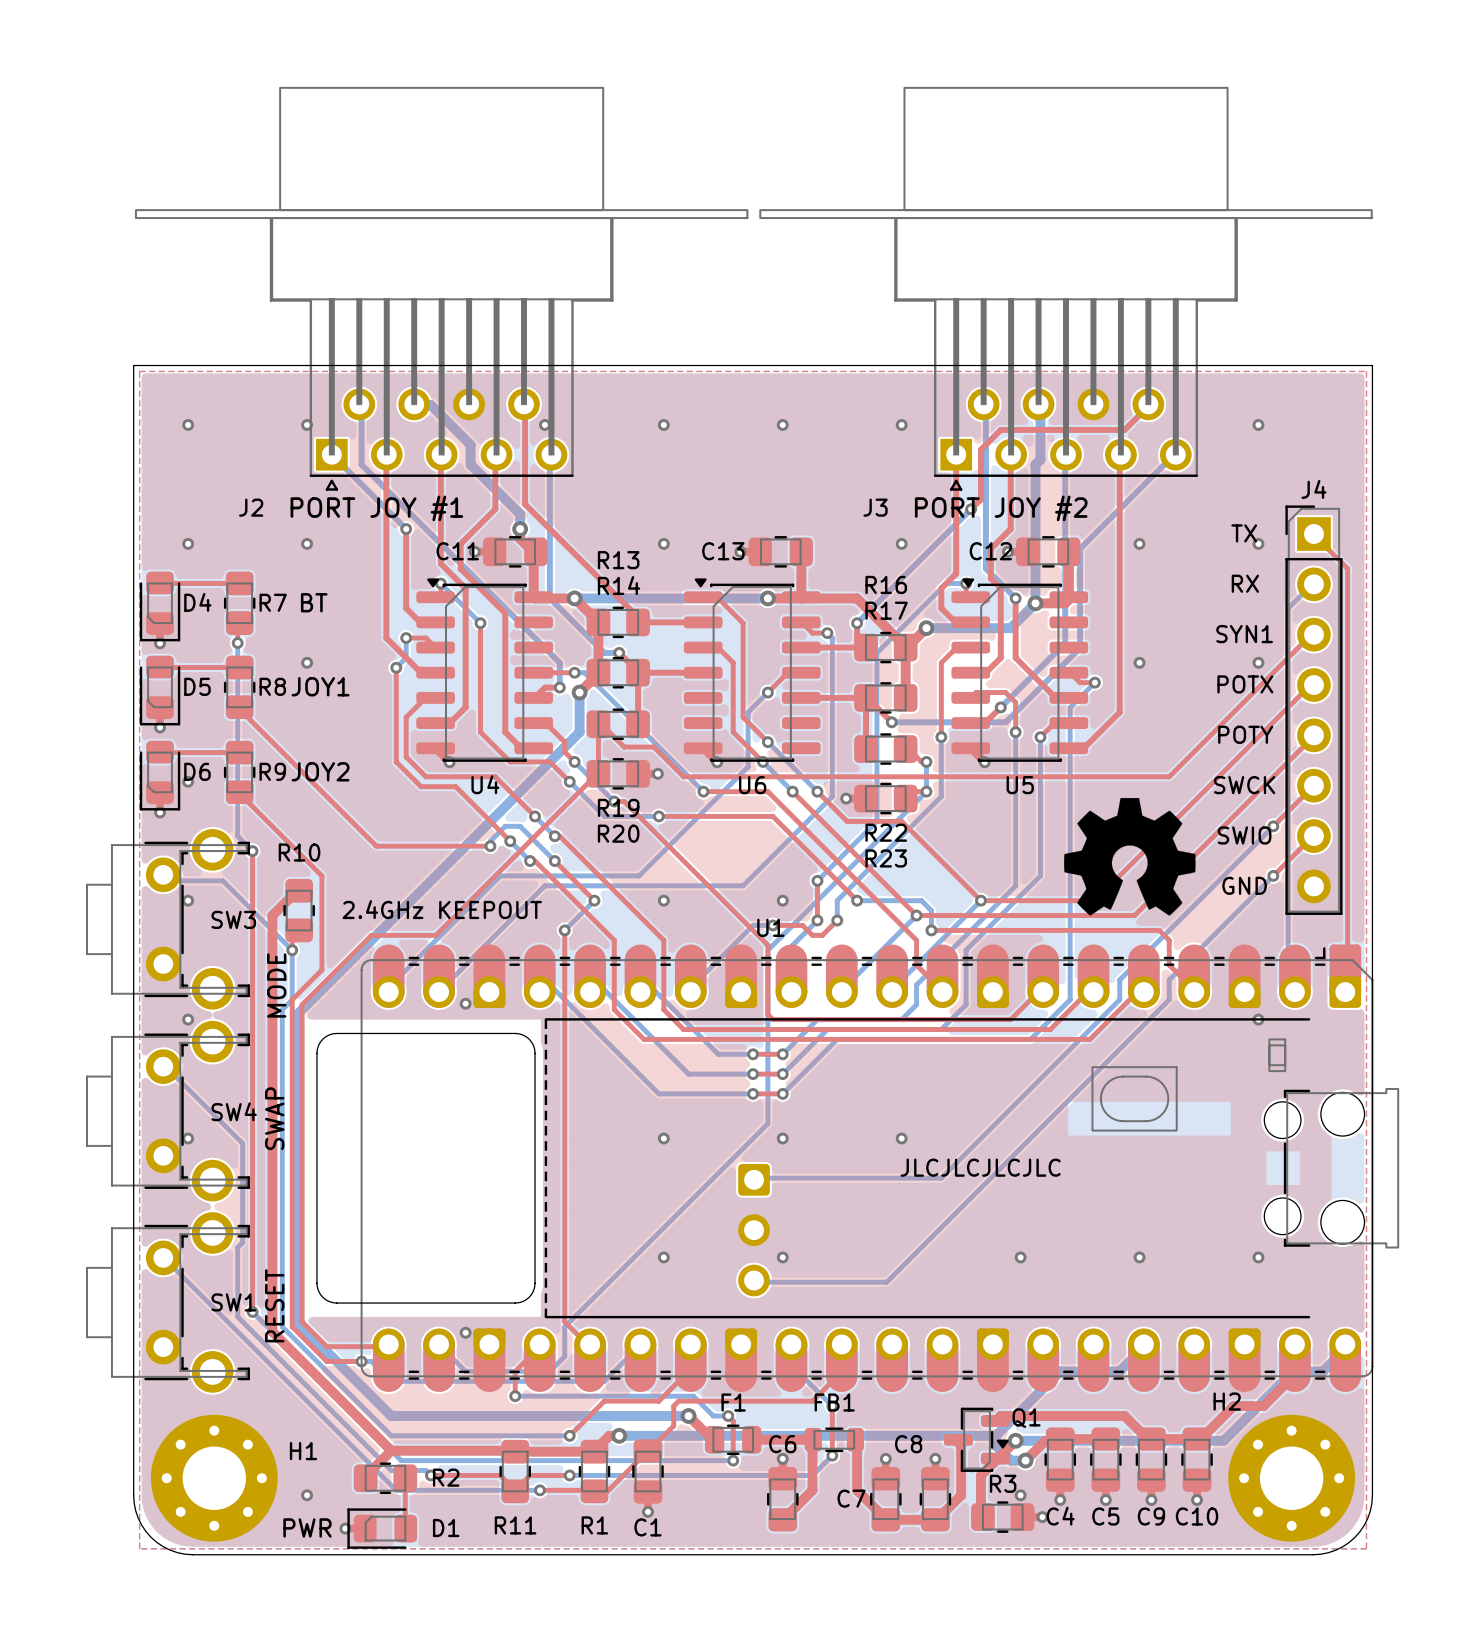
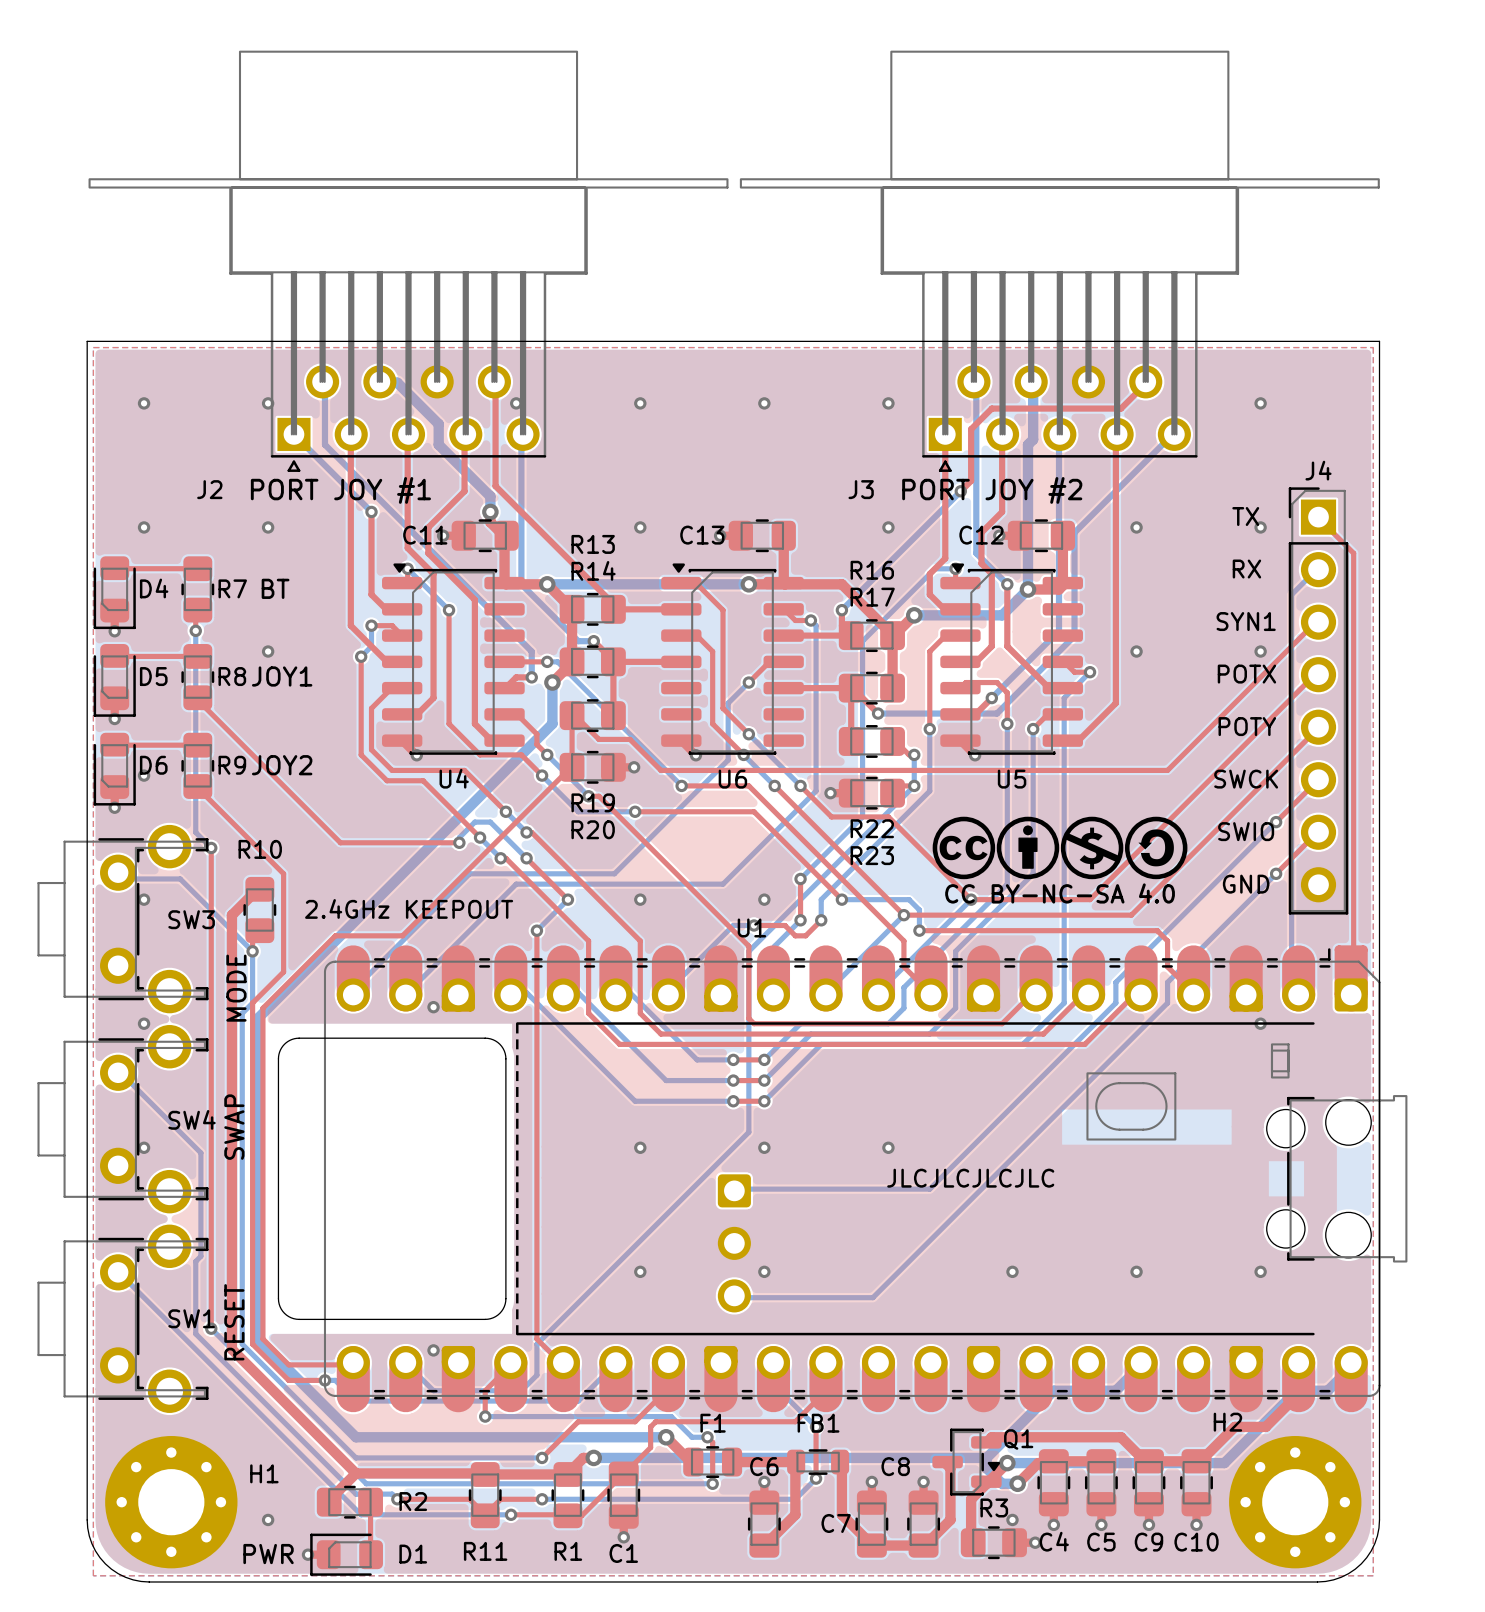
drawing: [1064, 797, 1196, 916] -> none
drawing: none -> [932, 816, 1188, 880]

